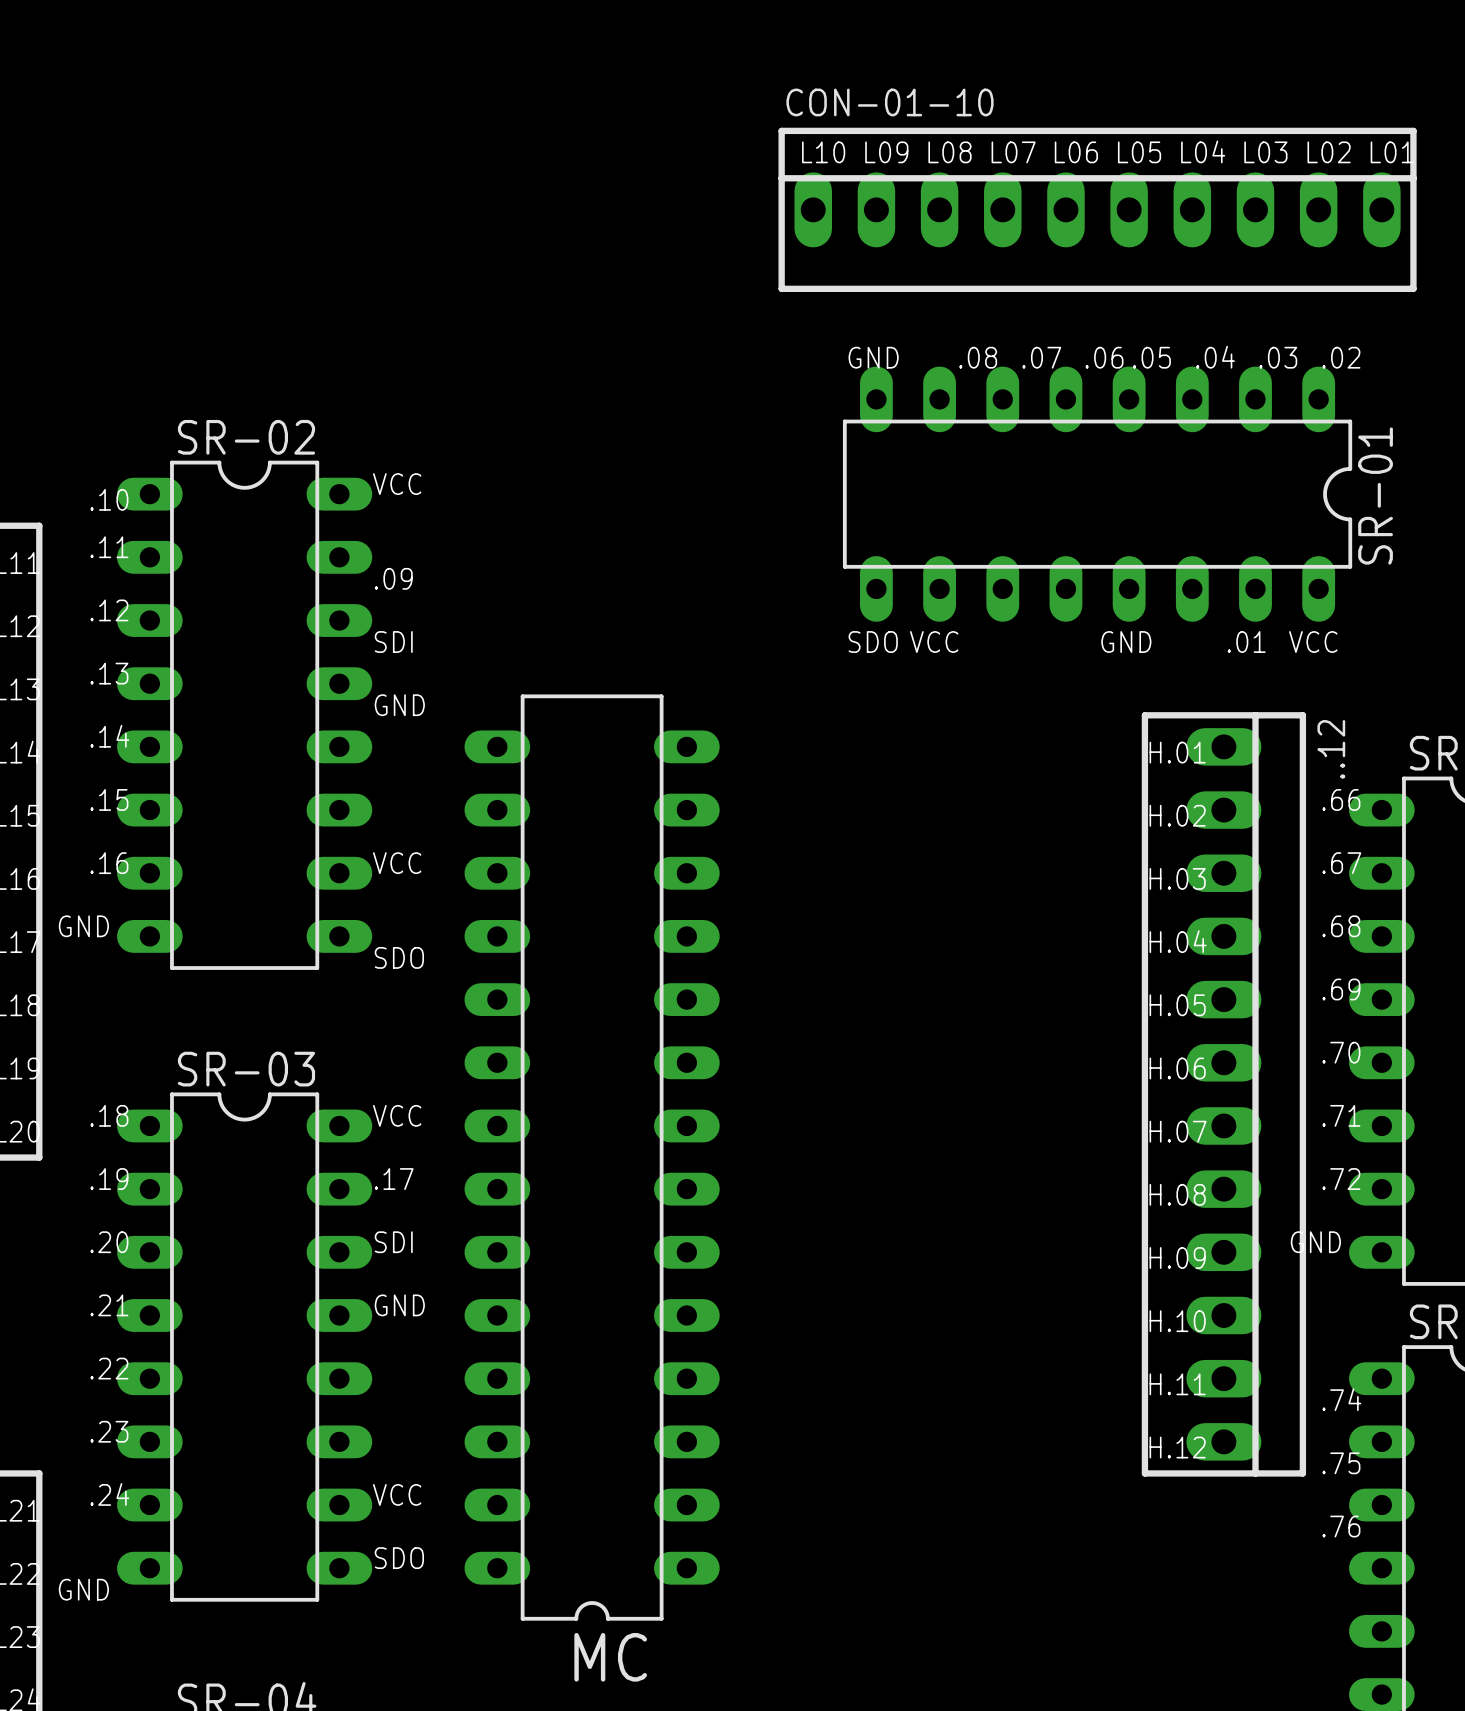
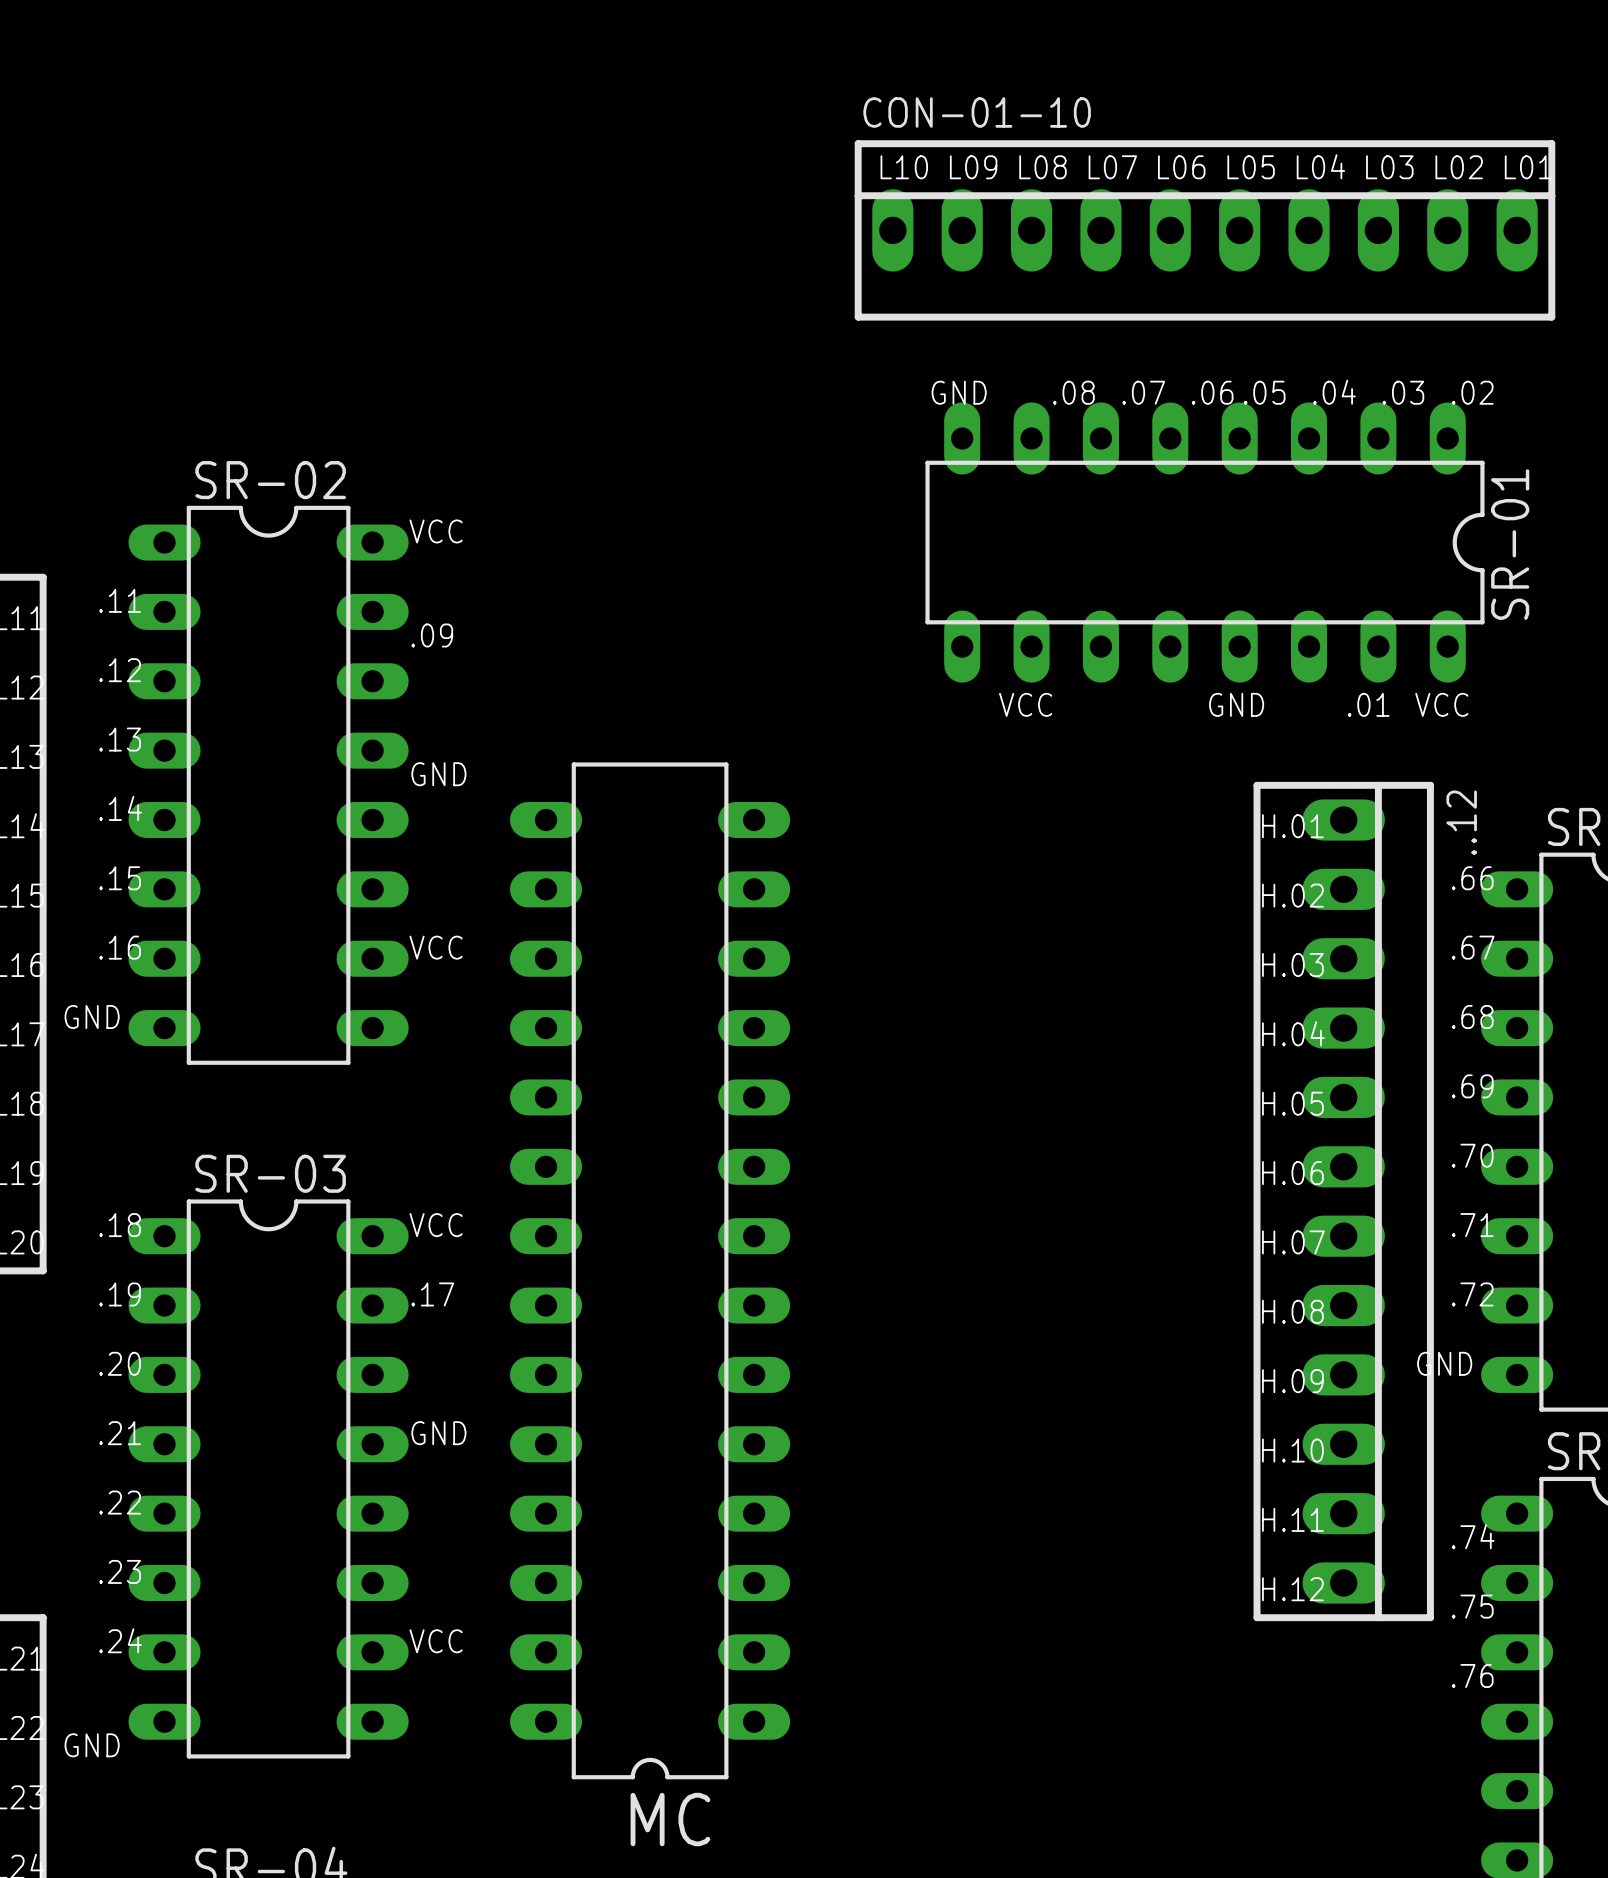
text: .10 (109, 499) -> none
text: SDI (393, 642) -> none
text: SDO (873, 642) -> none
text: SDO (399, 957) -> none
text: SDI (393, 1242) -> none
text: SDO (399, 1558) -> none

